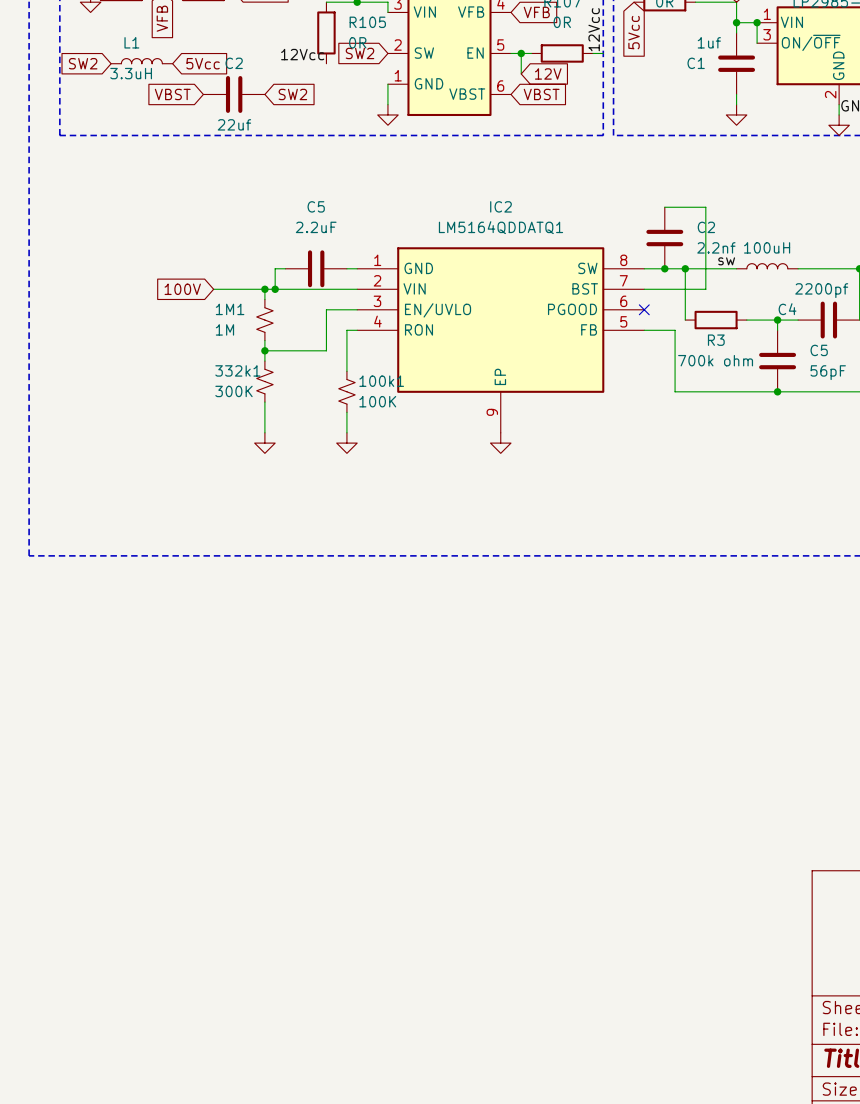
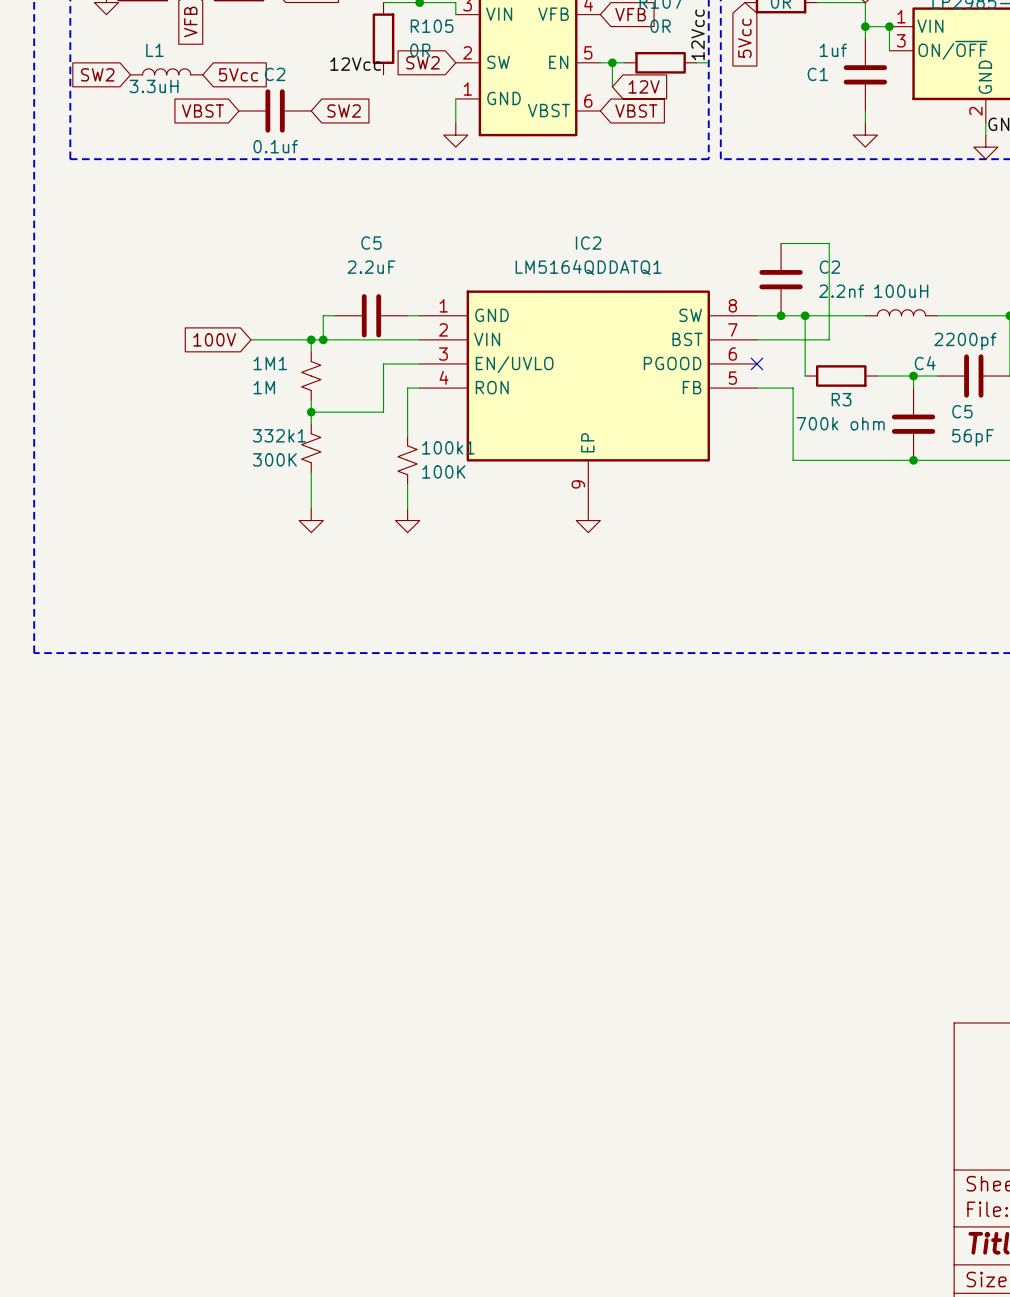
C2 value: 22uf (234, 124) -> 0.1uf (275, 146)
label: sw (726, 261) -> none

